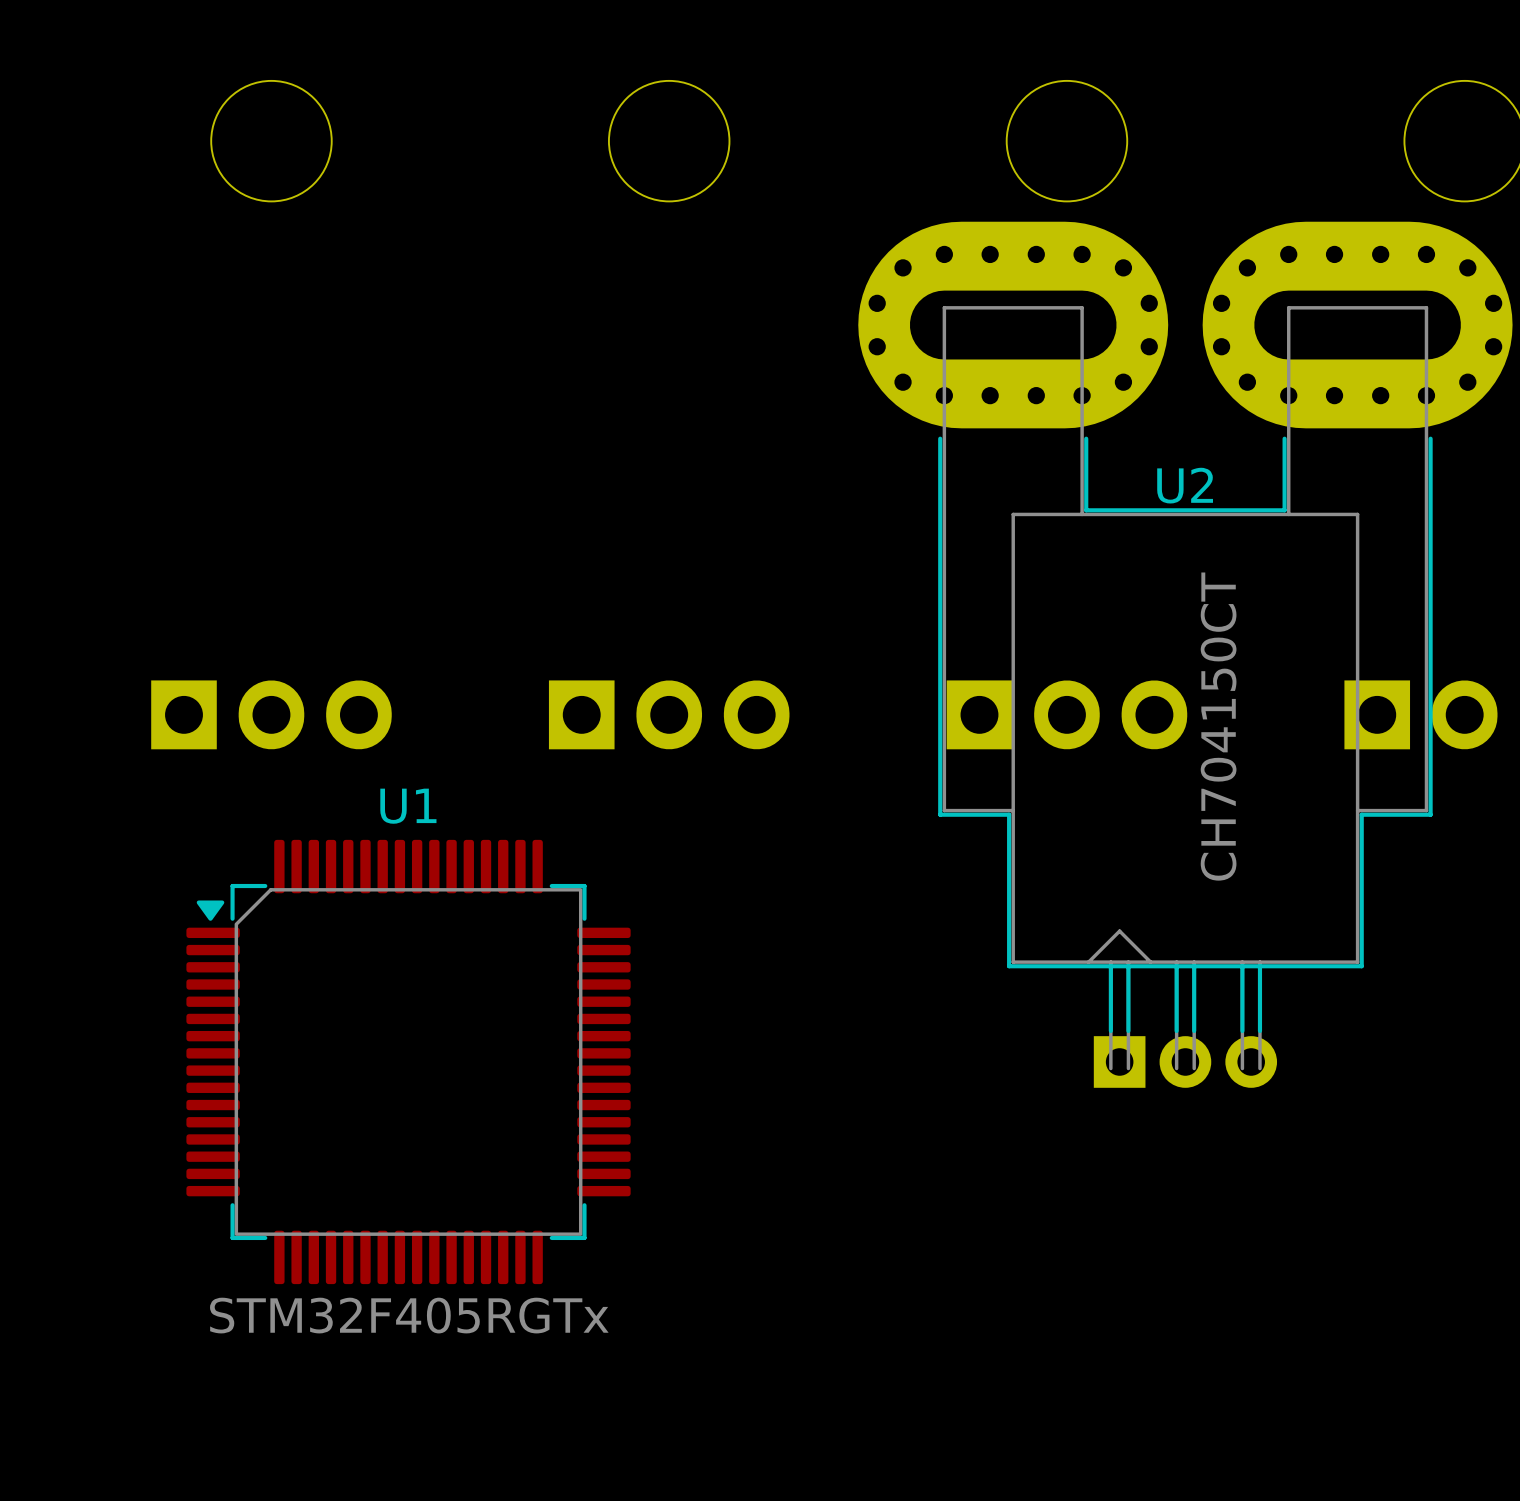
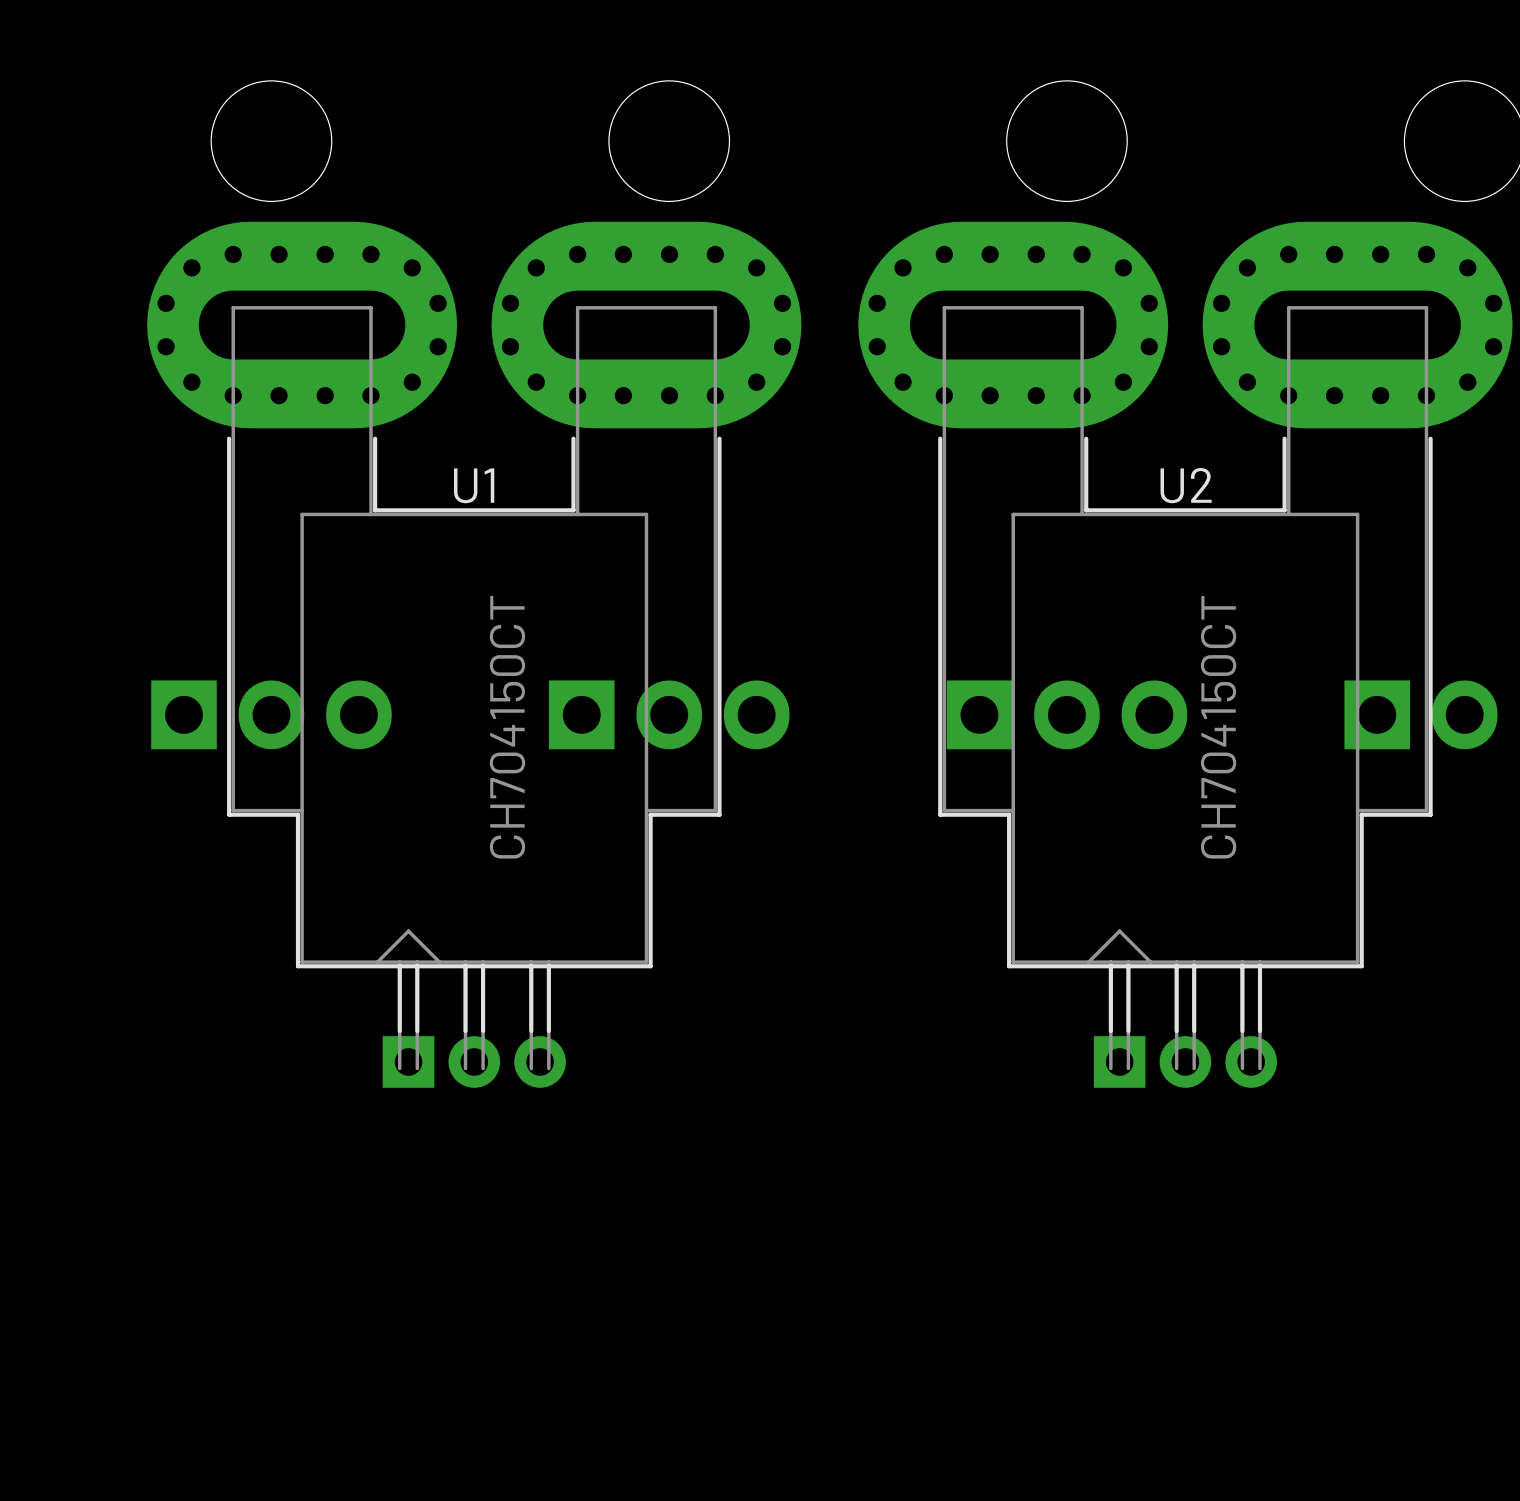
U1 name position: U1 (408, 806) -> U1 (474, 485)
U1 footprint: [186, 839, 631, 1285] -> [147, 221, 802, 1088]
U1 value: STM32F405RGTx (409, 1315) -> CH704150CT (507, 727)

